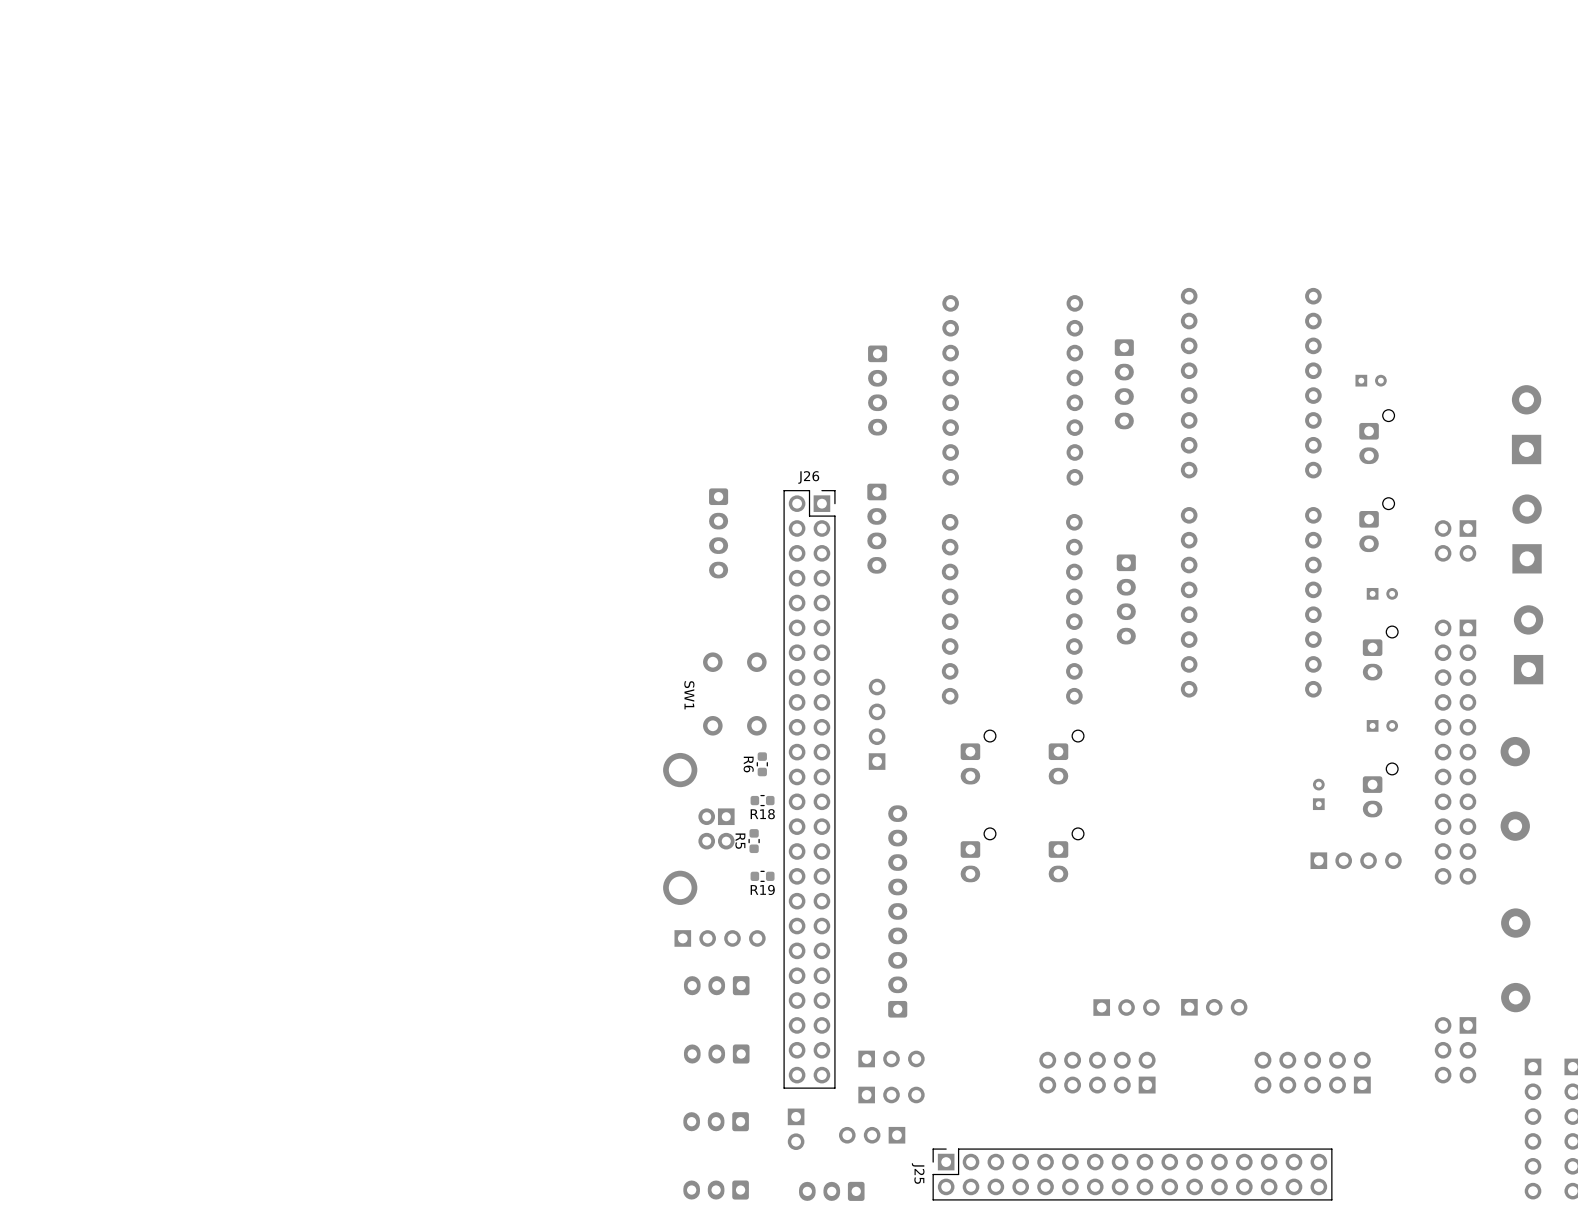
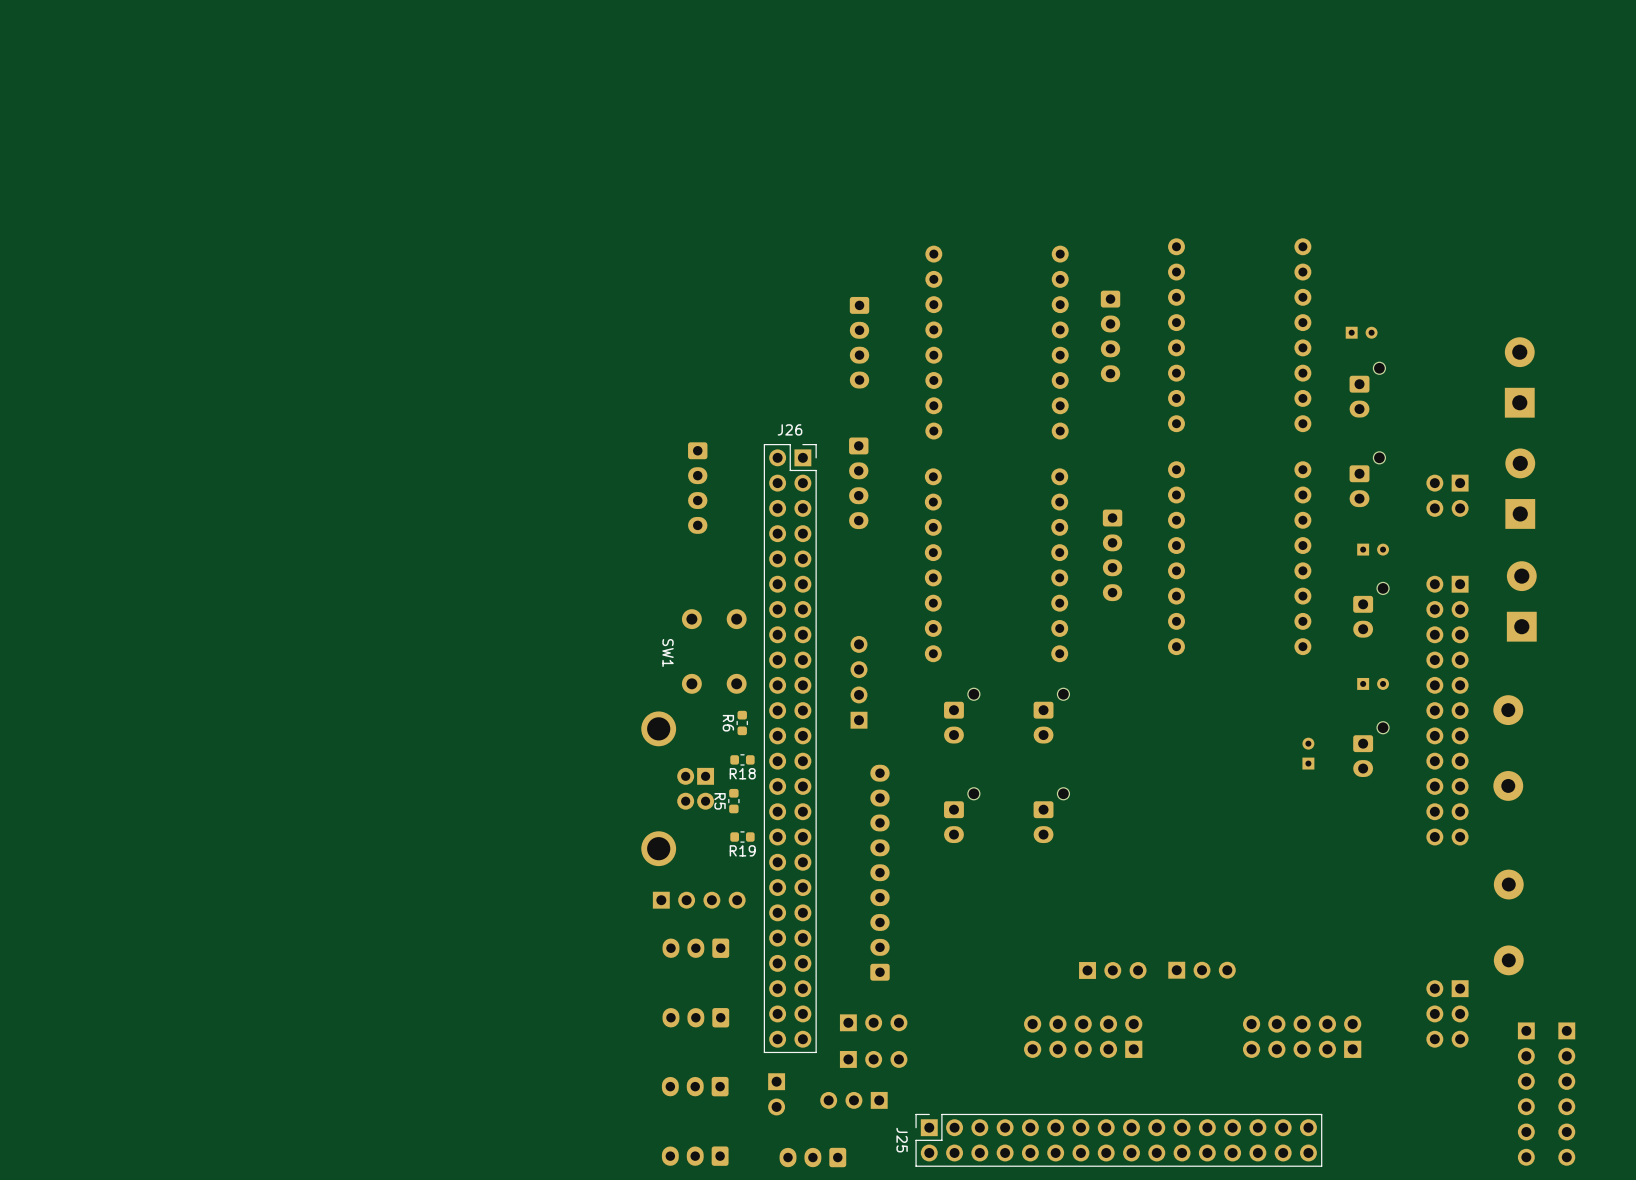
part: (1356, 860) -> none

